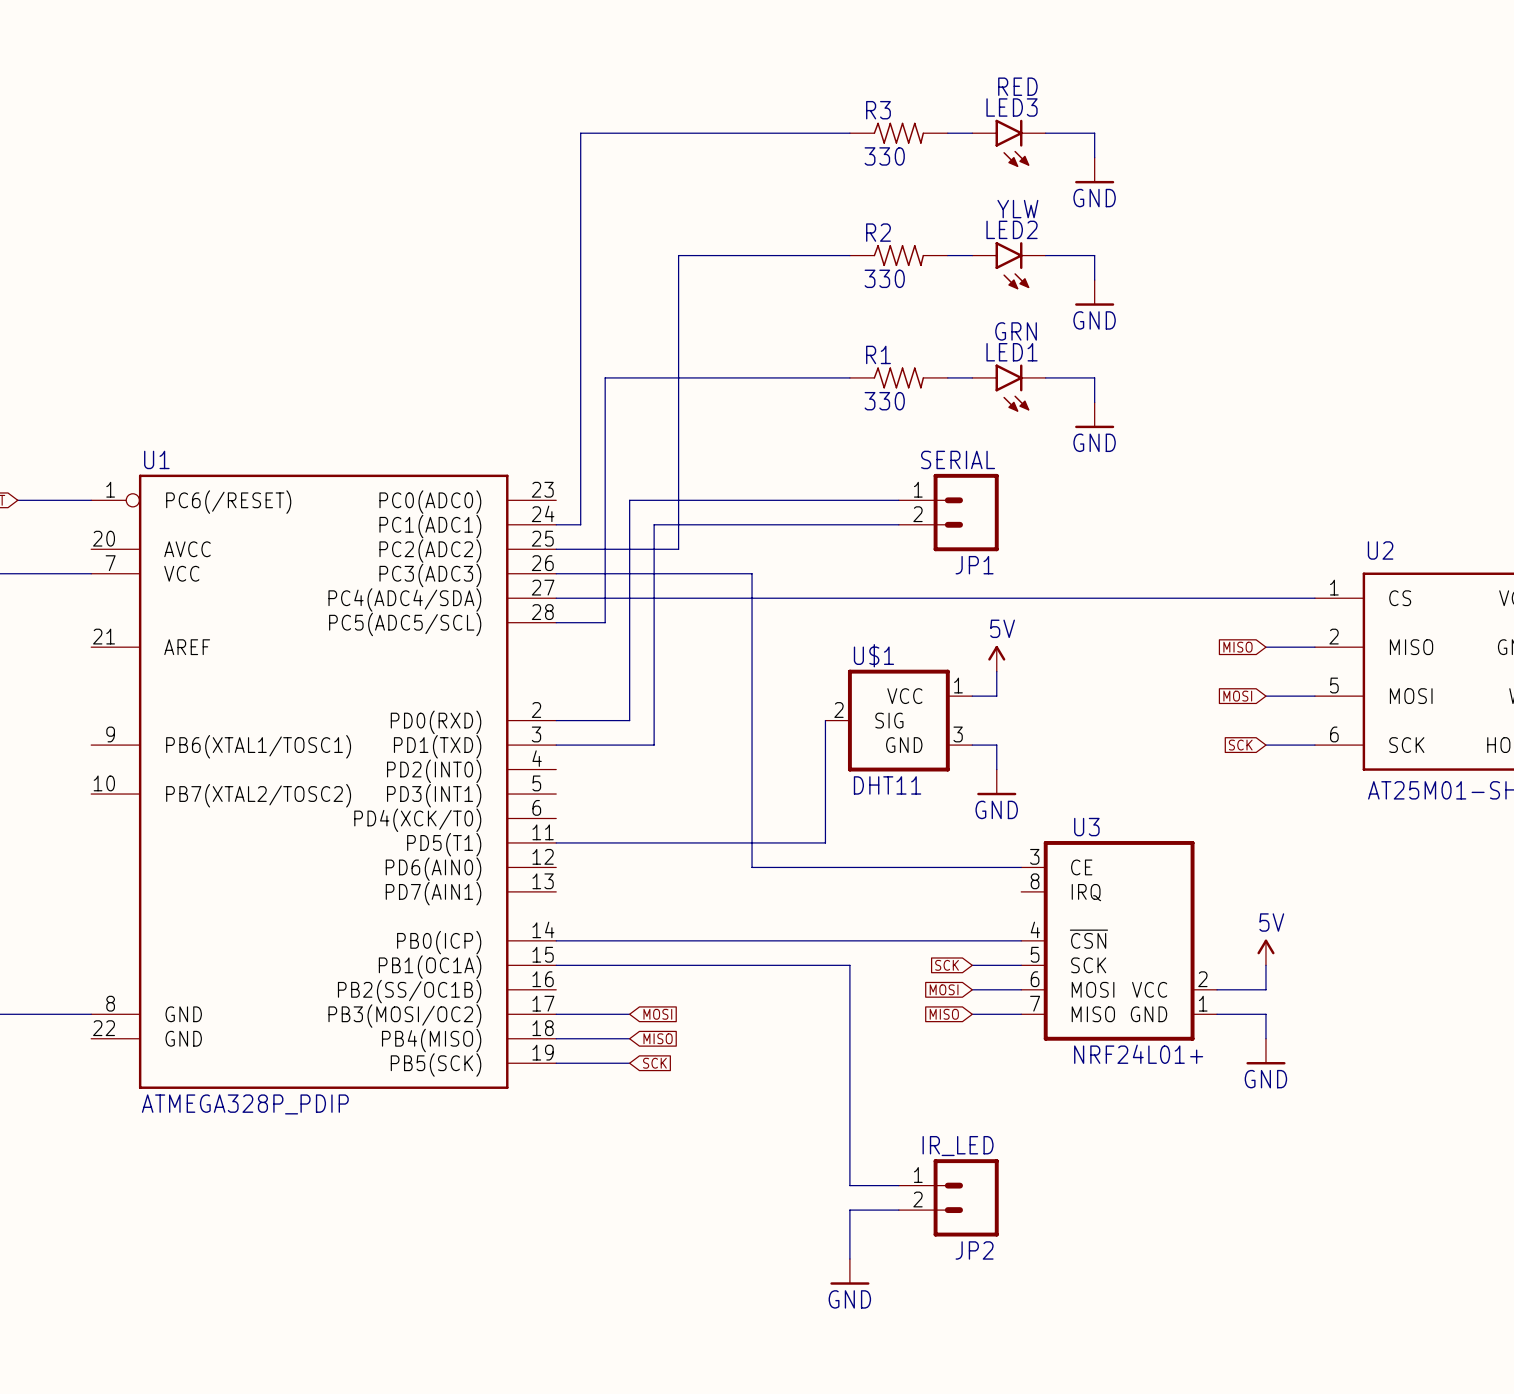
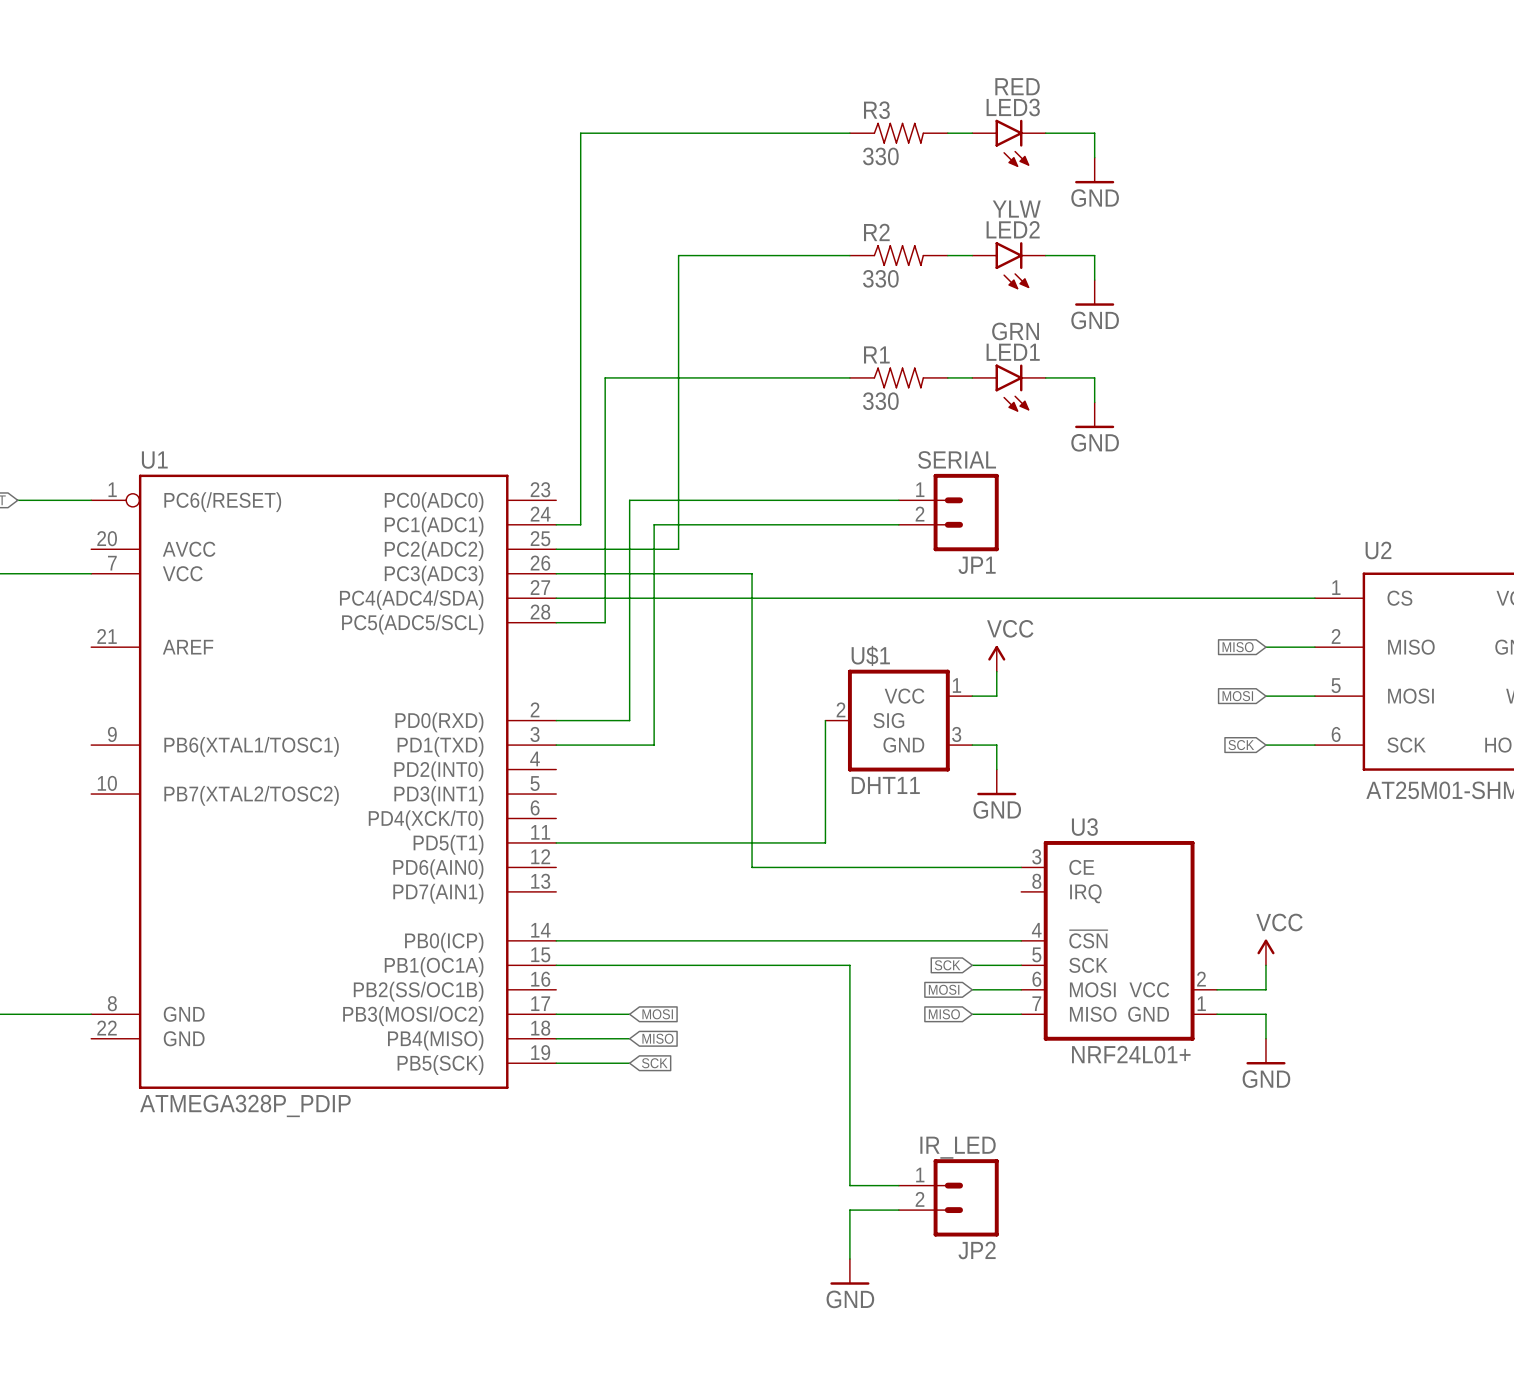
power symbol: 5V (996, 658) -> VCC (996, 658)
power symbol: 5V (1265, 952) -> VCC (1265, 952)

